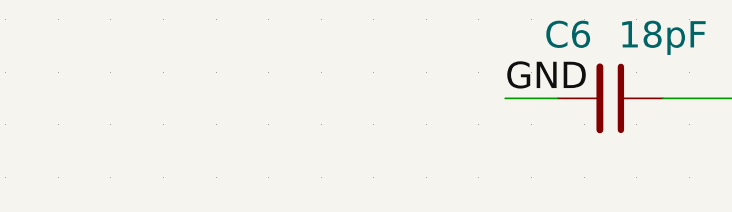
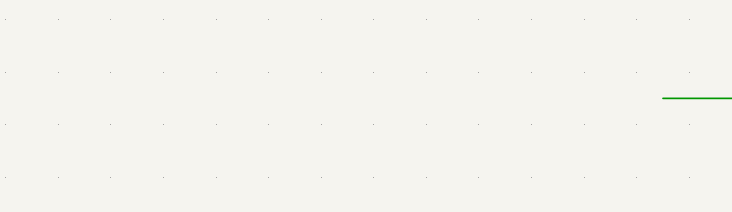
label: GND (546, 74) -> none
wire: (505, 98) (557, 98) -> none
C6: 18pF (610, 98) -> none

